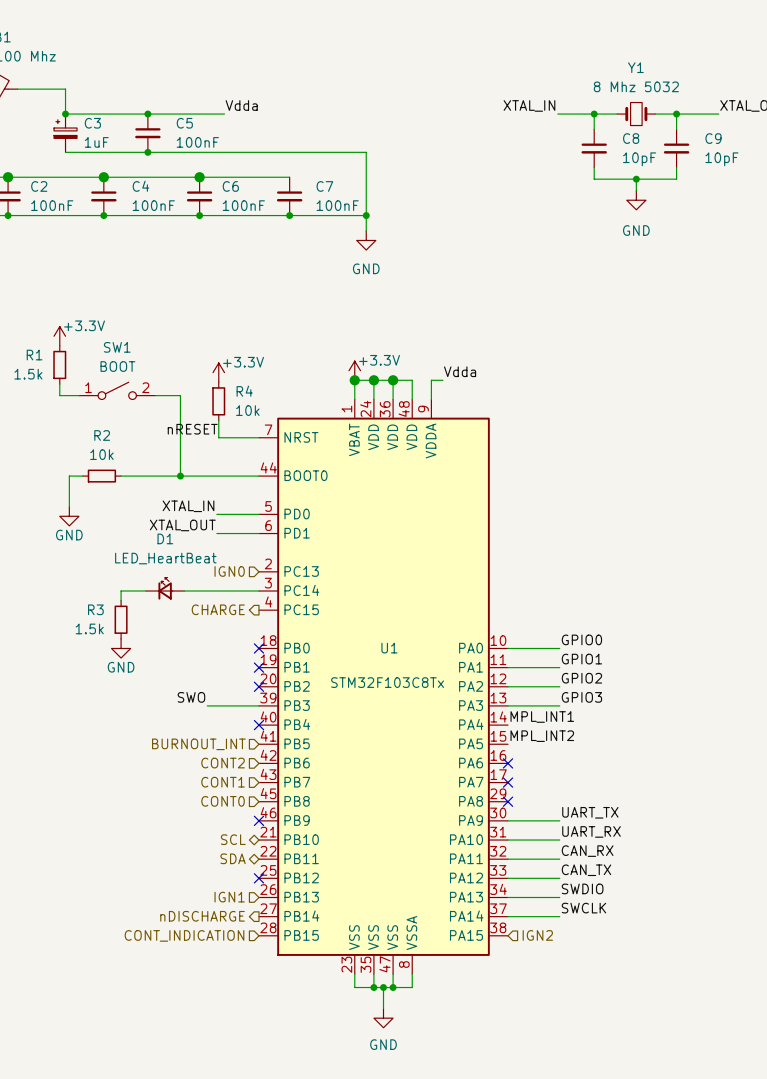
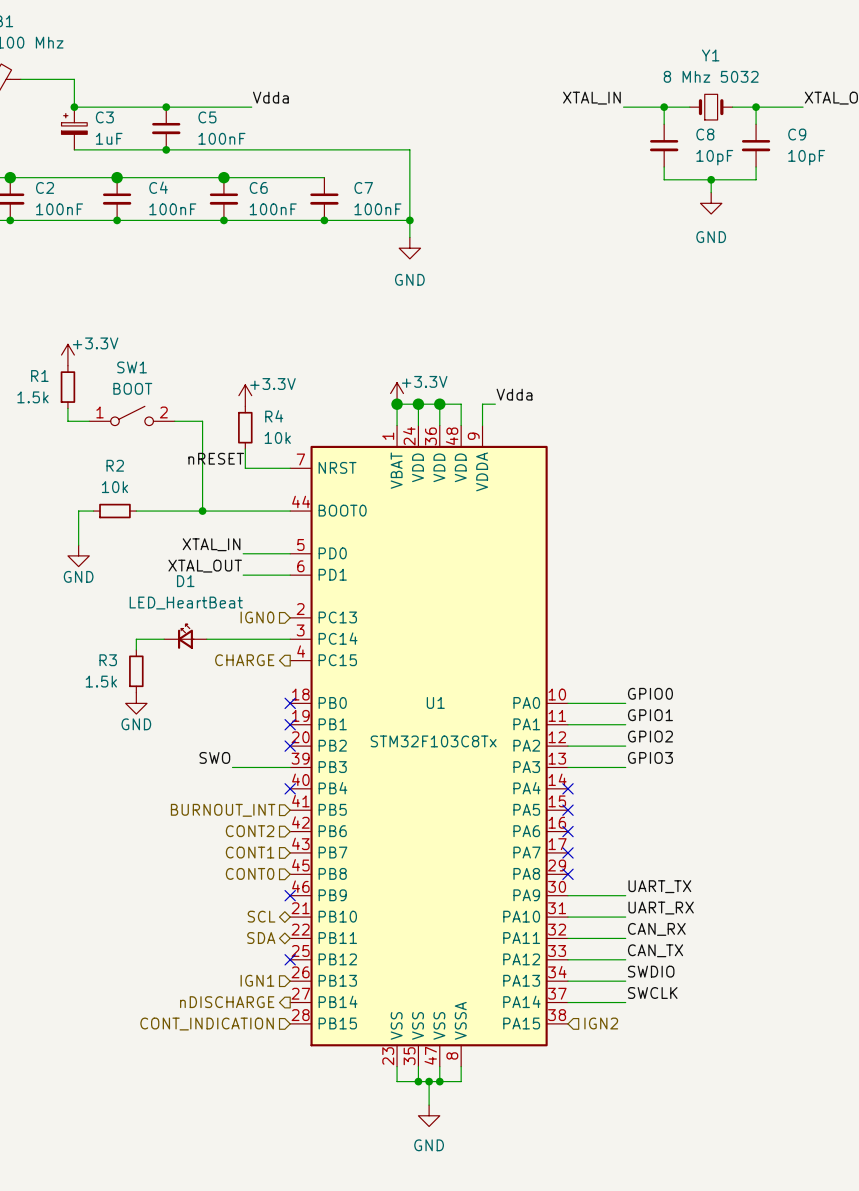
label: MPL_INT1 (542, 717) -> none
no-connect mark: none -> (568, 788)
label: MPL_INT2 (542, 736) -> none
no-connect mark: none -> (568, 810)

